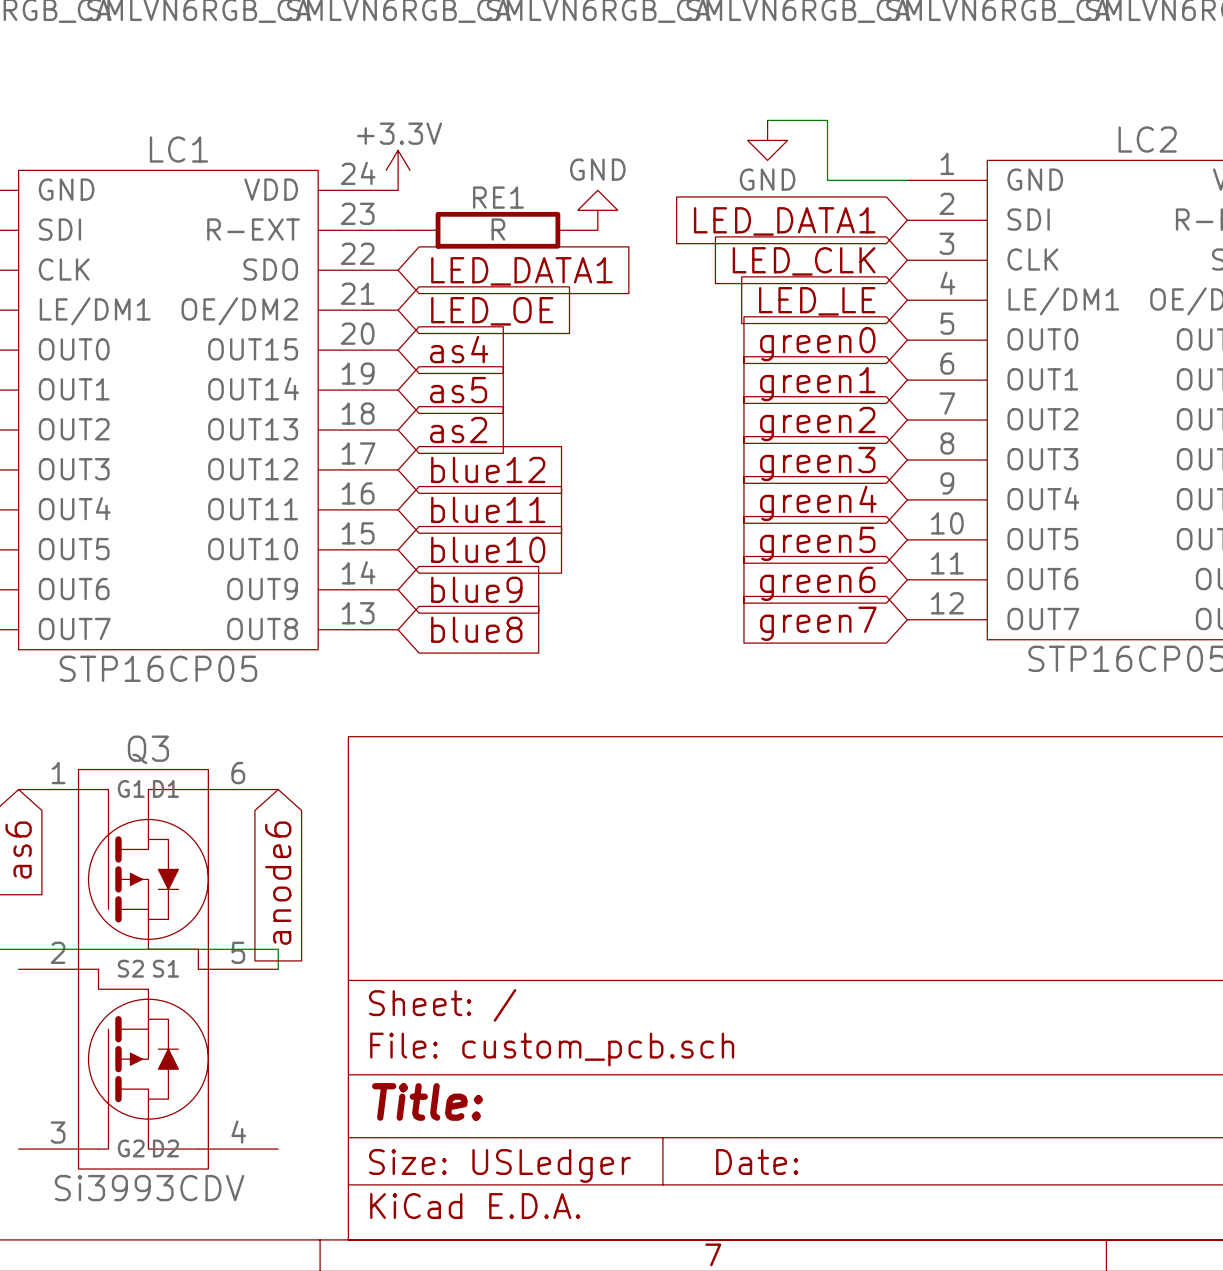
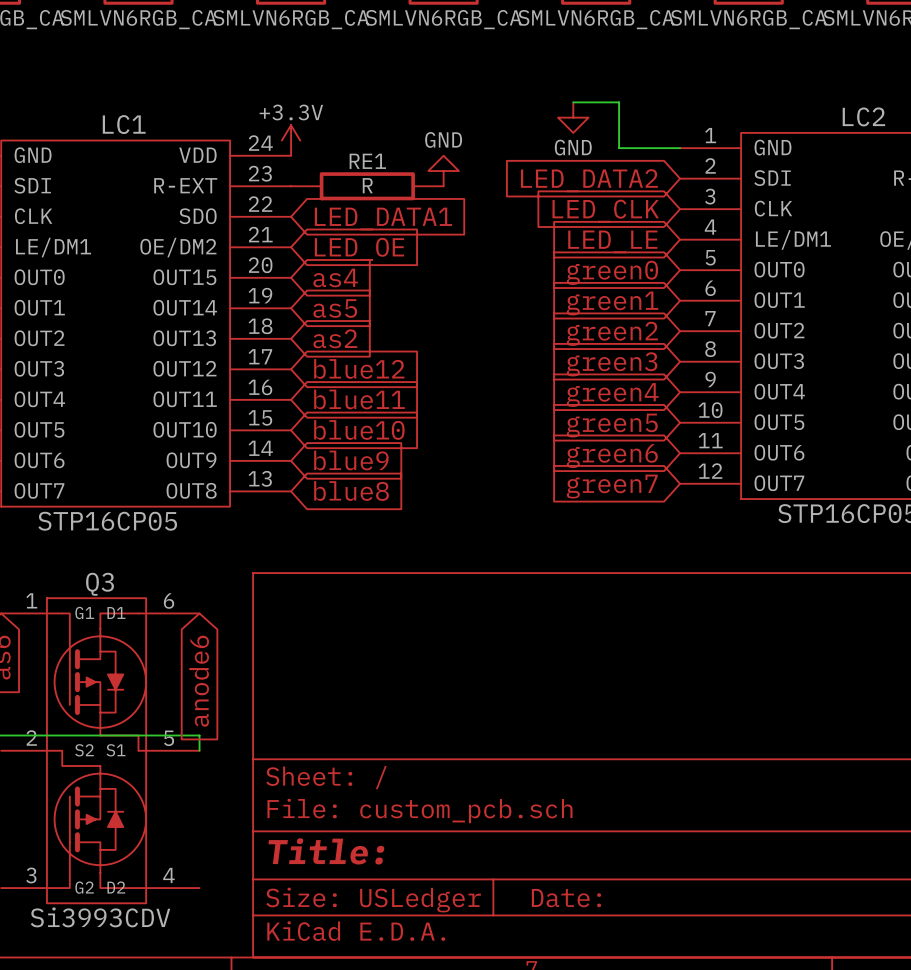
global label: LED_DATA1 (784, 221) -> LED_DATA2 (589, 180)

